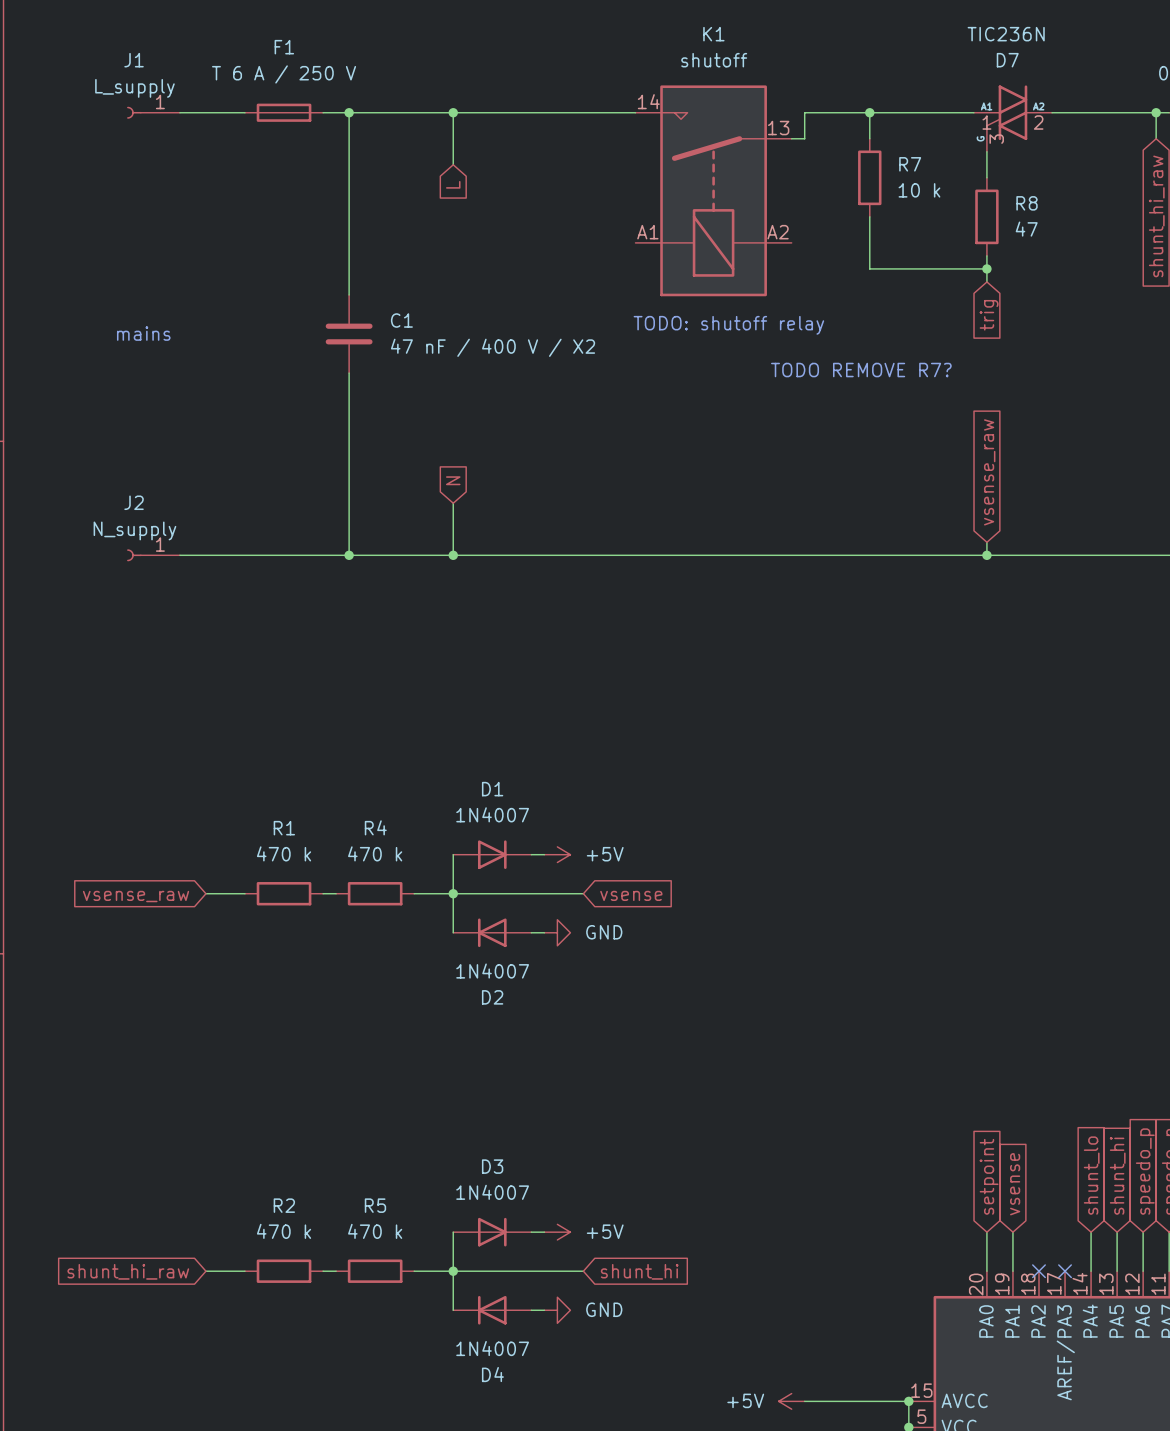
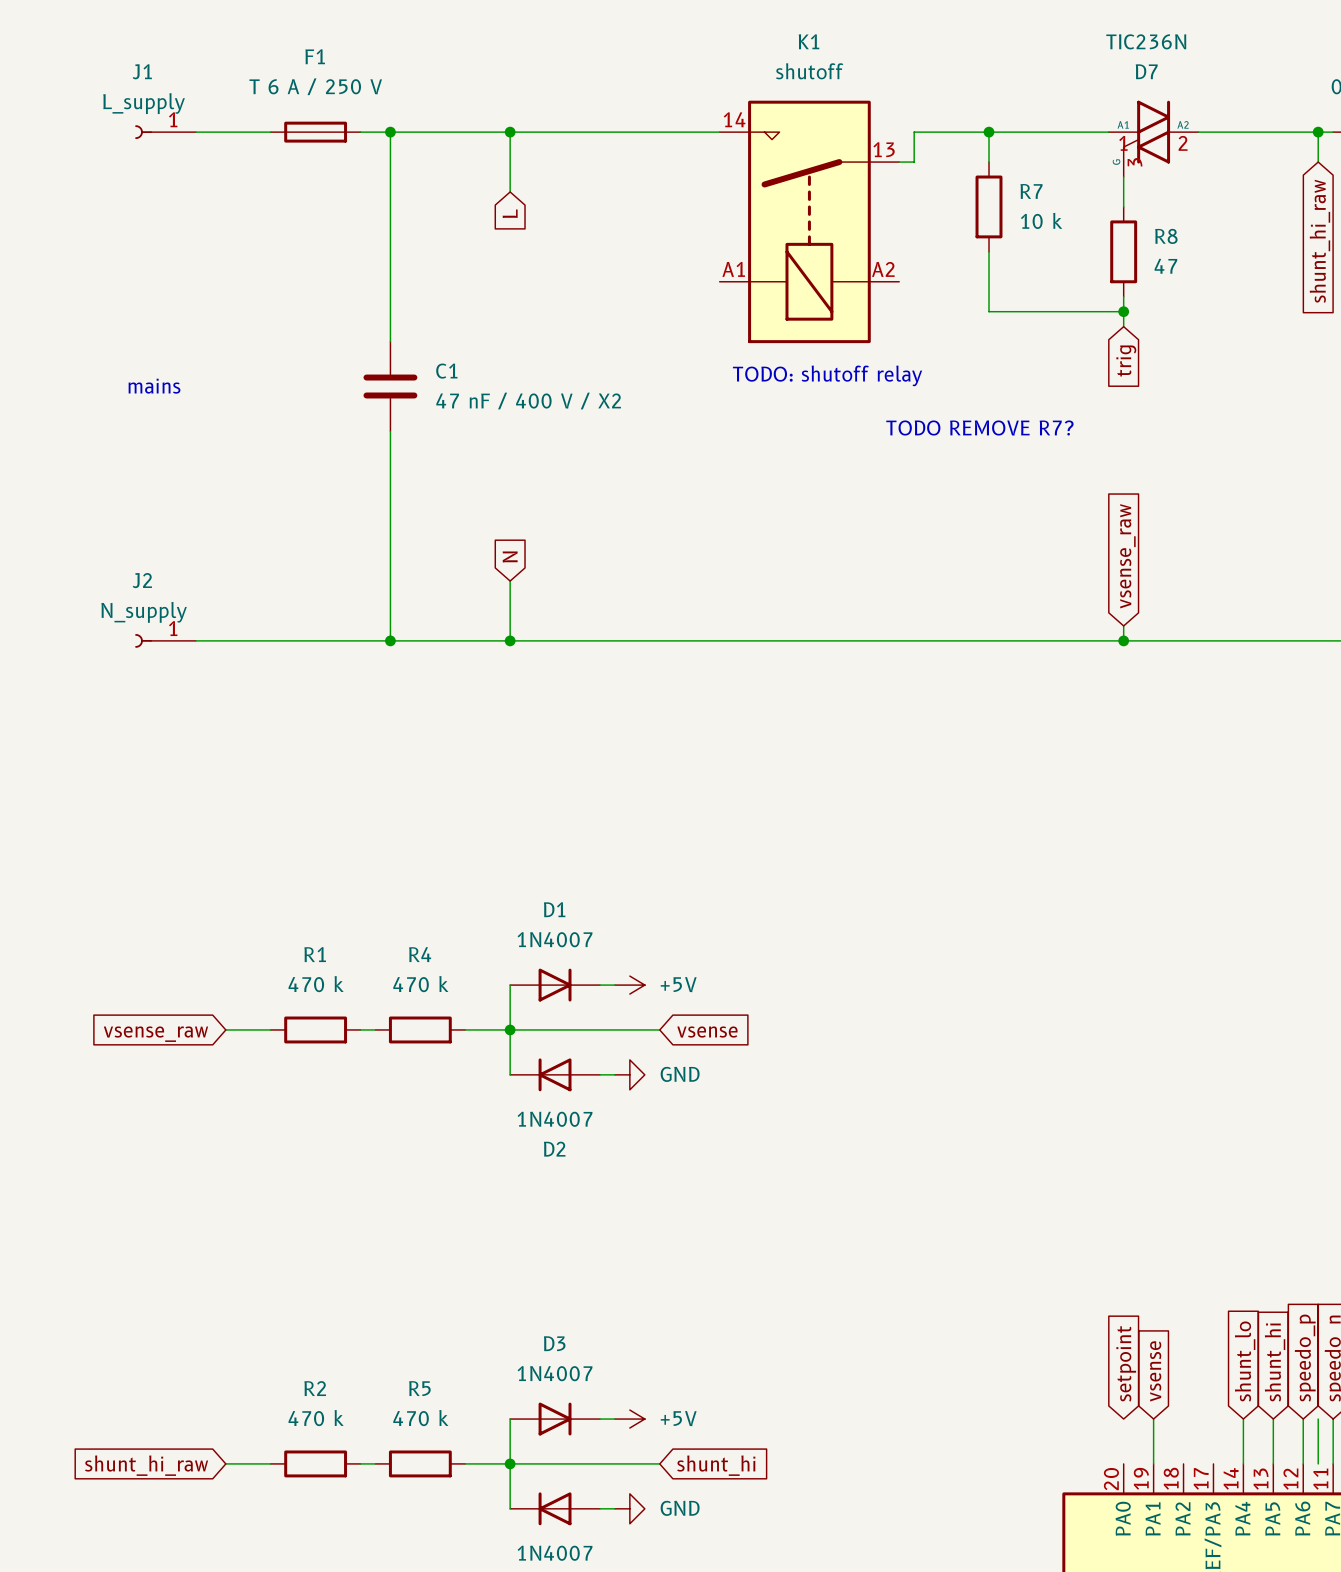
wire: (986, 1232) (986, 1271) -> (1318, 1419) (1318, 1463)
no-connect mark: (1038, 1271) -> none
no-connect mark: (1065, 1271) -> none

